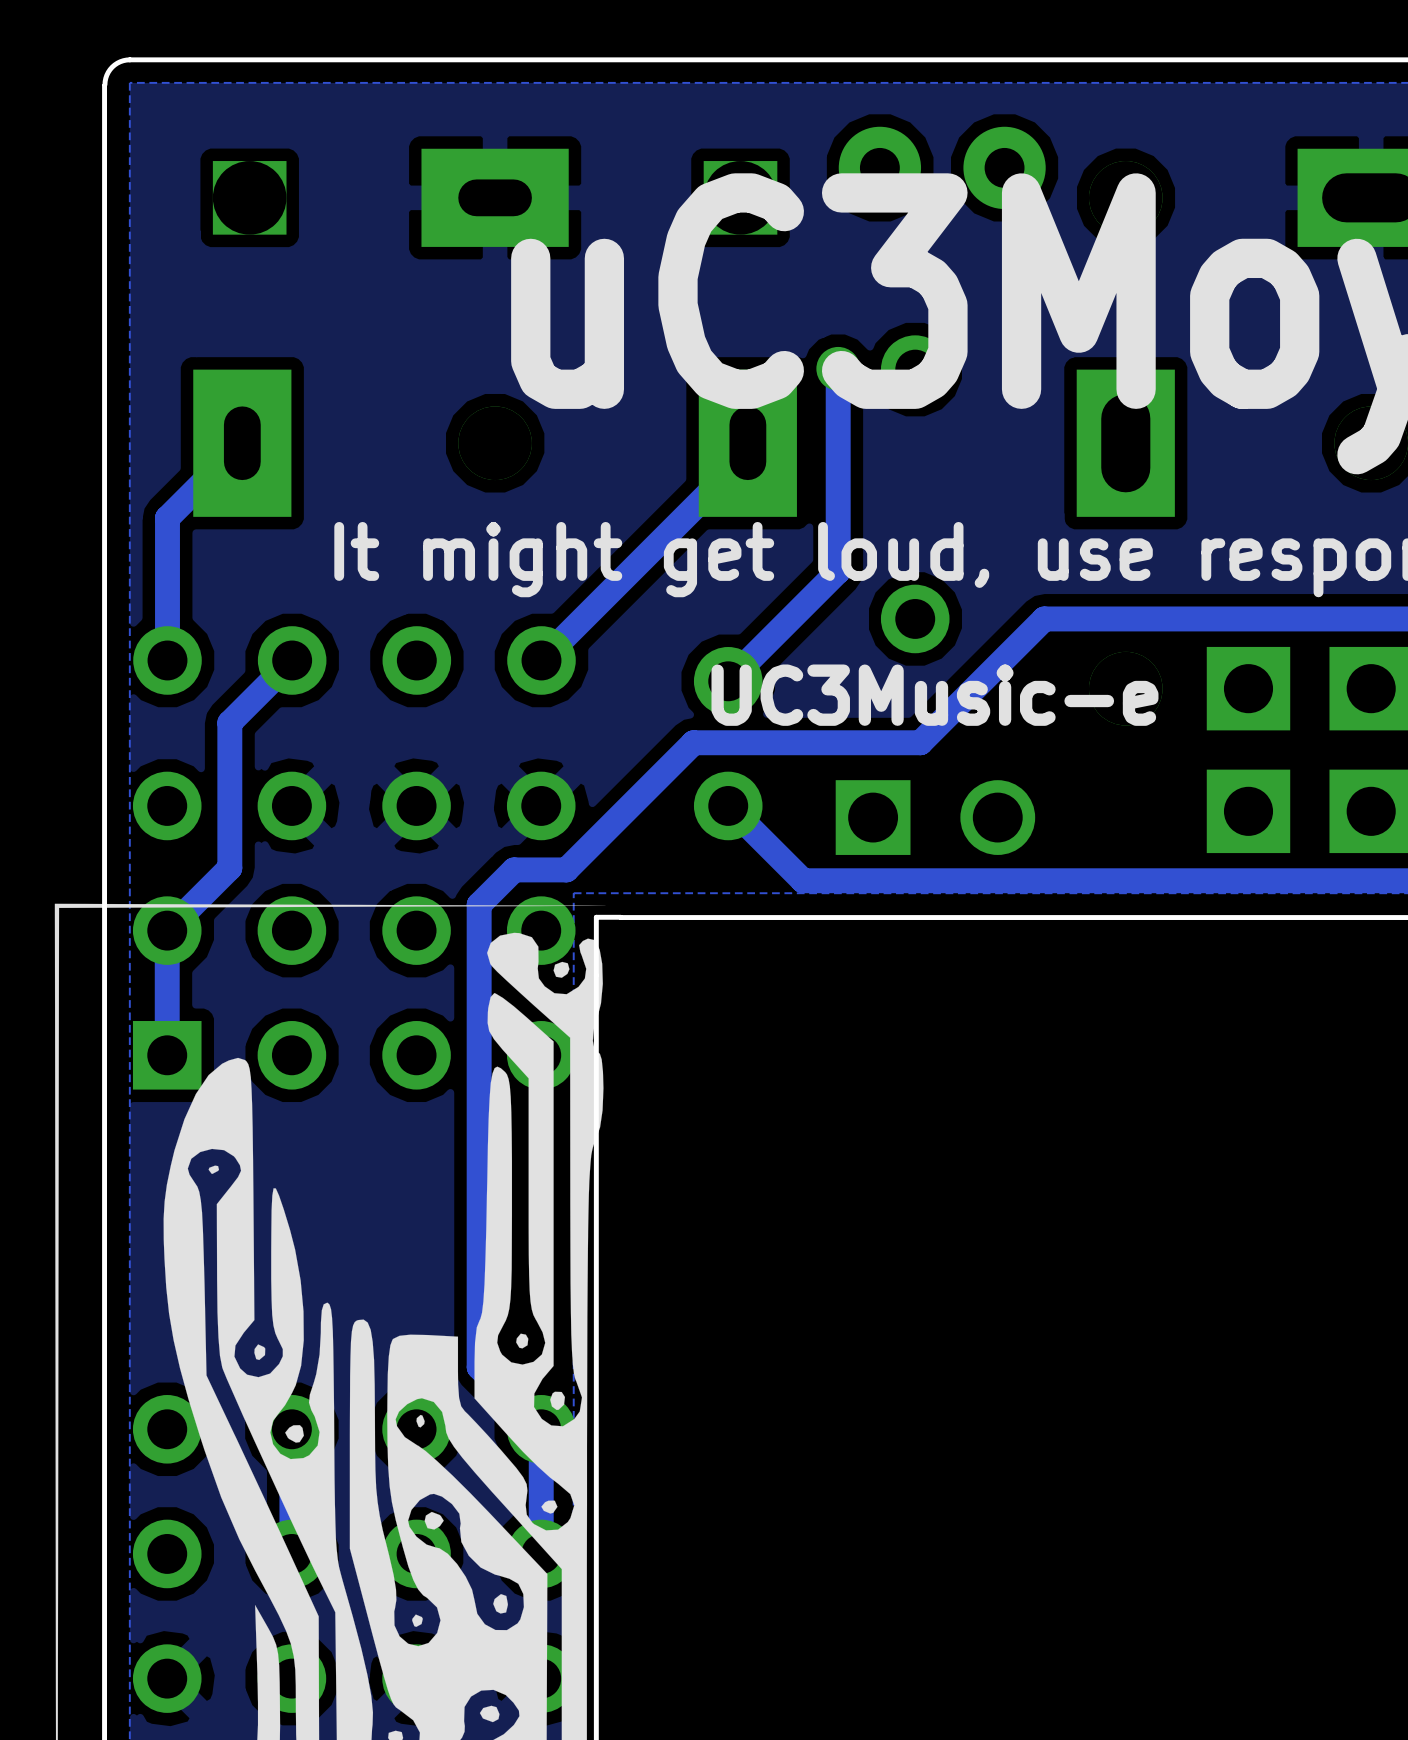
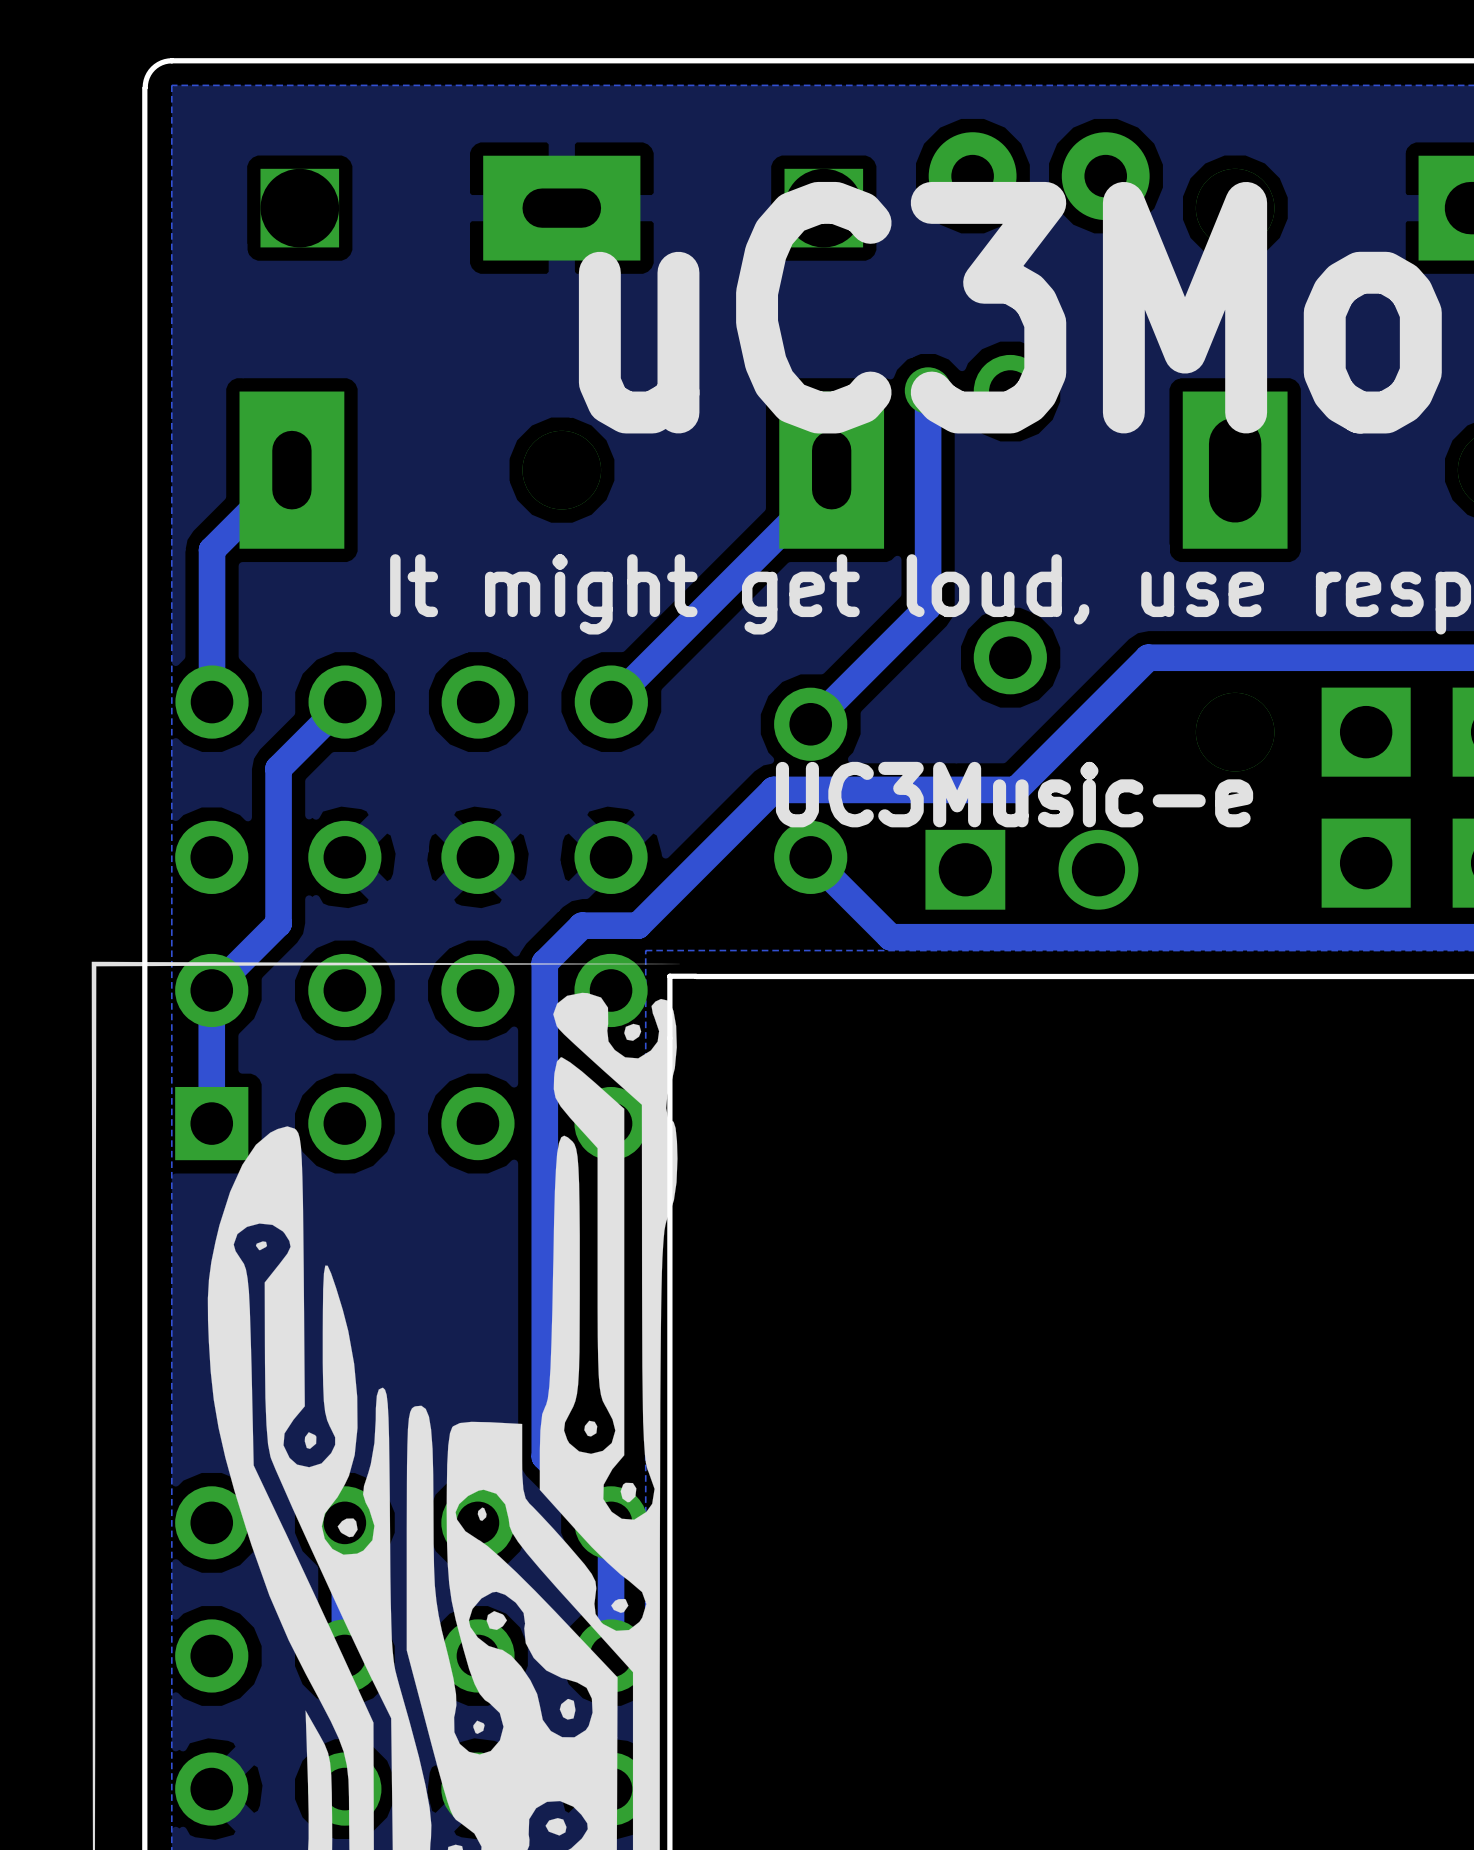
text position: UC3Music-e (934, 695) -> UC3Music-e (1014, 794)

